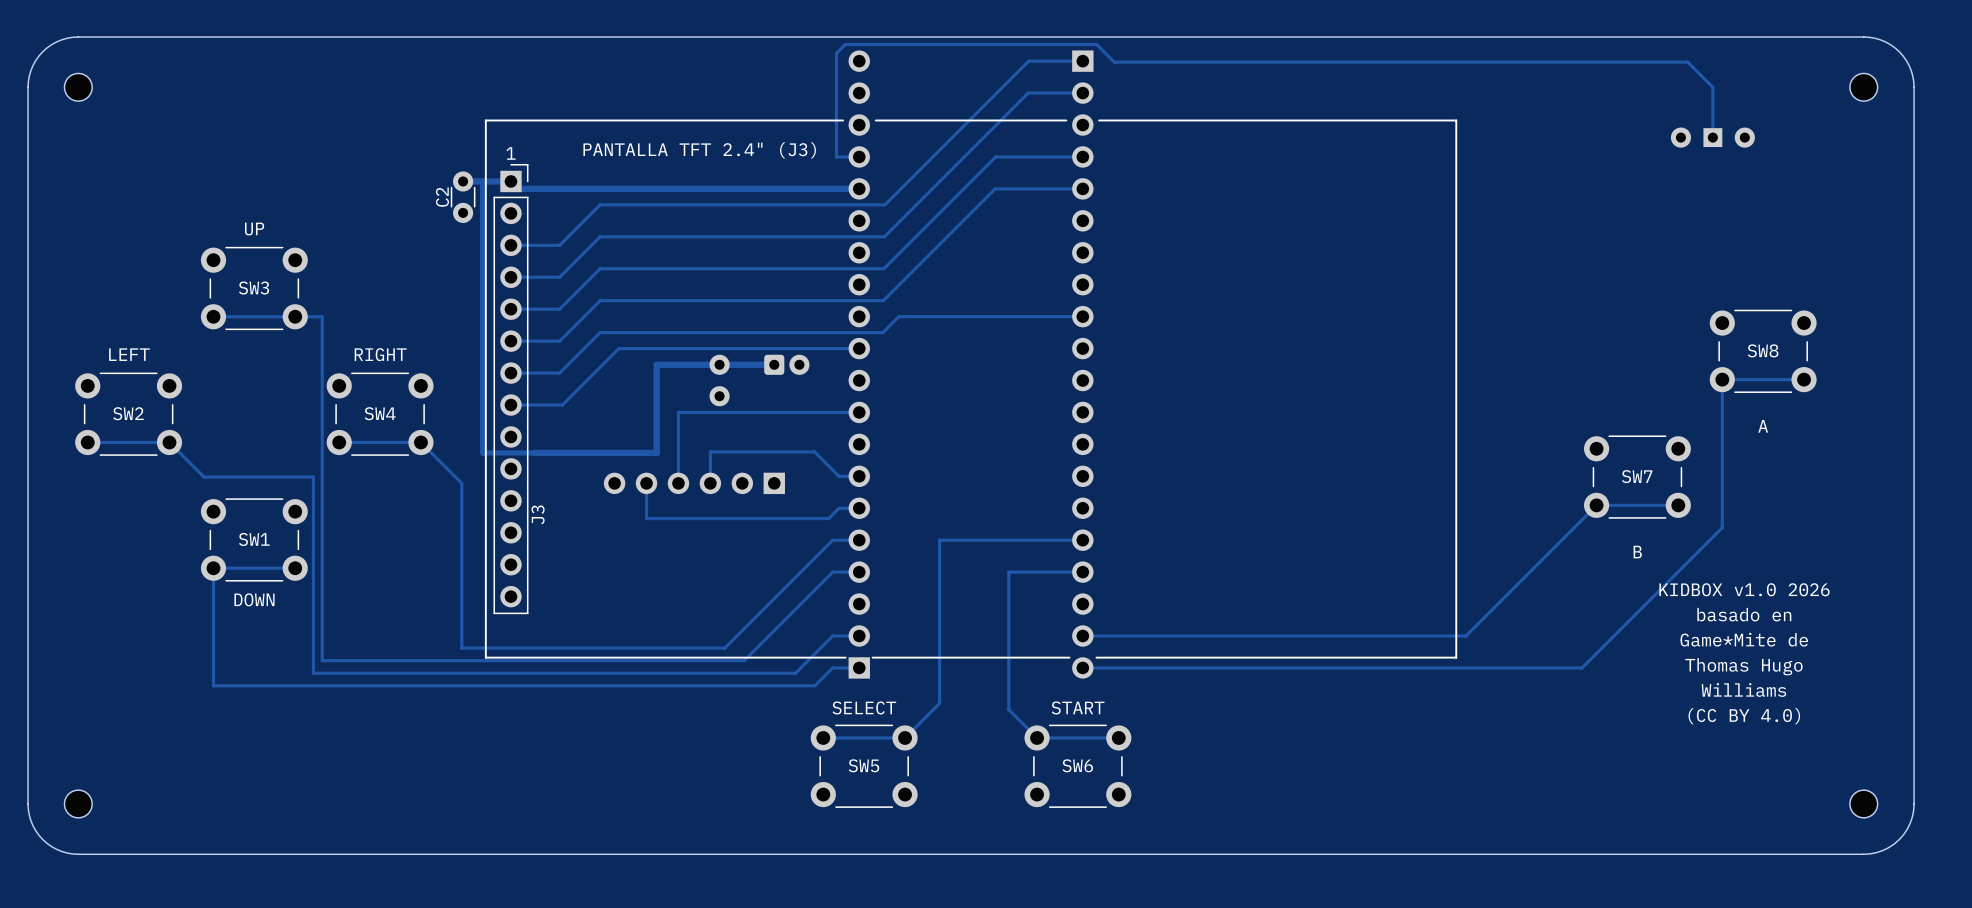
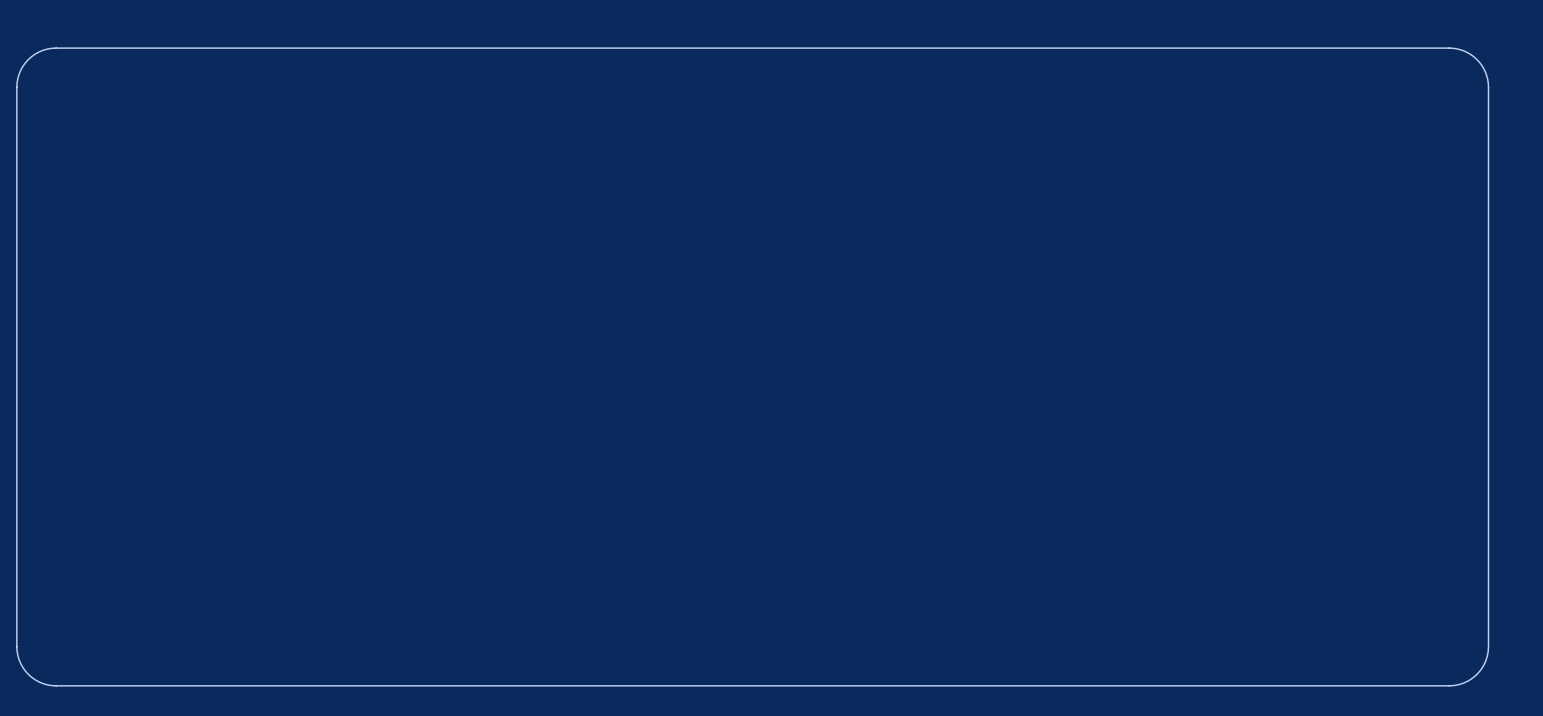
track: (1082, 61) (1028, 61) (884, 204) (600, 204) (559, 245) (510, 245) -> none
part: (78, 87) -> none
part: (1863, 87) -> none
track: (1082, 93) (1028, 93) (884, 236) (600, 236) (559, 277) (510, 277) -> none
line: (843, 120) (485, 120) (485, 657) (845, 657) -> none
line: (875, 120) (1066, 120) -> none
line: (1099, 120) (1456, 120) (1456, 657) (1096, 657) -> none
track: (1712, 137) (1712, 87) (1687, 62) (1114, 62) (1096, 44) (845, 44) (836, 53) (836, 156) (859, 156) -> none
part: (1712, 137) -> none
text: PANTALLA TFT 2.4" (J3) (699, 150) -> none
text: 1 (511, 153) -> none
track: (1082, 156) (995, 156) (883, 268) (600, 268) (559, 309) (510, 309) -> none
track: (463, 181) (510, 181) (518, 188) (859, 188) -> none
track: (483, 181) (483, 452) (656, 452) (656, 364) (774, 364) -> none
track: (1082, 188) (995, 188) (883, 300) (600, 300) (559, 341) (510, 341) -> none
C2: (463, 197) -> none
text: UP (254, 229) -> none
SW3: (254, 288) -> none
track: (213, 316) (322, 316) (322, 660) (744, 660) (832, 572) (859, 572) -> none
track: (1082, 316) (898, 316) (882, 332) (600, 332) (559, 373) (510, 373) -> none
track: (859, 348) (618, 348) (562, 405) (510, 405) -> none
SW8: (1763, 351) -> none
text: LEFT (129, 354) -> none
text: RIGHT (380, 354) -> none
part: (786, 364) -> none
part: (859, 364) -> none
part: (1082, 364) -> none
track: (1804, 379) (1722, 379) (1722, 527) (1582, 667) (1082, 667) -> none
part: (719, 380) -> none
J3: (510, 389) -> none
track: (859, 412) (678, 412) (678, 483) -> none
SW2: (128, 414) -> none
SW4: (380, 414) -> none
text: A (1763, 426) -> none
track: (87, 442) (169, 442) (204, 477) (313, 477) (313, 673) (795, 673) (832, 636) (859, 636) -> none
track: (339, 442) (420, 442) (461, 483) (461, 648) (724, 648) (832, 540) (859, 540) -> none
track: (859, 476) (839, 476) (814, 451) (710, 451) (710, 483) -> none
SW7: (1637, 477) -> none
track: (646, 483) (646, 518) (828, 518) (839, 508) (859, 508) -> none
part: (694, 483) -> none
track: (1678, 505) (1596, 505) (1465, 636) (1082, 636) -> none
SW1: (254, 539) -> none
track: (1082, 540) (939, 540) (939, 703) (905, 737) (823, 737) -> none
text: B (1637, 552) -> none
track: (295, 568) (213, 568) (213, 685) (814, 685) (832, 667) (859, 667) -> none
track: (1082, 572) (1008, 572) (1008, 709) (1037, 737) (1118, 737) -> none
text: KIDBOX v1.0 2026 (1744, 589) -> none
text: DOWN (254, 599) -> none
text: basado en (1744, 614) -> none
text: Game*Mite de (1744, 639) -> none
line: (872, 657) (1069, 657) -> none
text: Thomas Hugo (1743, 666) -> none
text: Williams (1743, 690) -> none
text: SELECT (864, 707) -> none
text: START (1078, 707) -> none
text: (CC BY 4.0) (1744, 716) -> none
SW5: (864, 766) -> none
SW6: (1077, 766) -> none
part: (78, 803) -> none
part: (1863, 803) -> none

